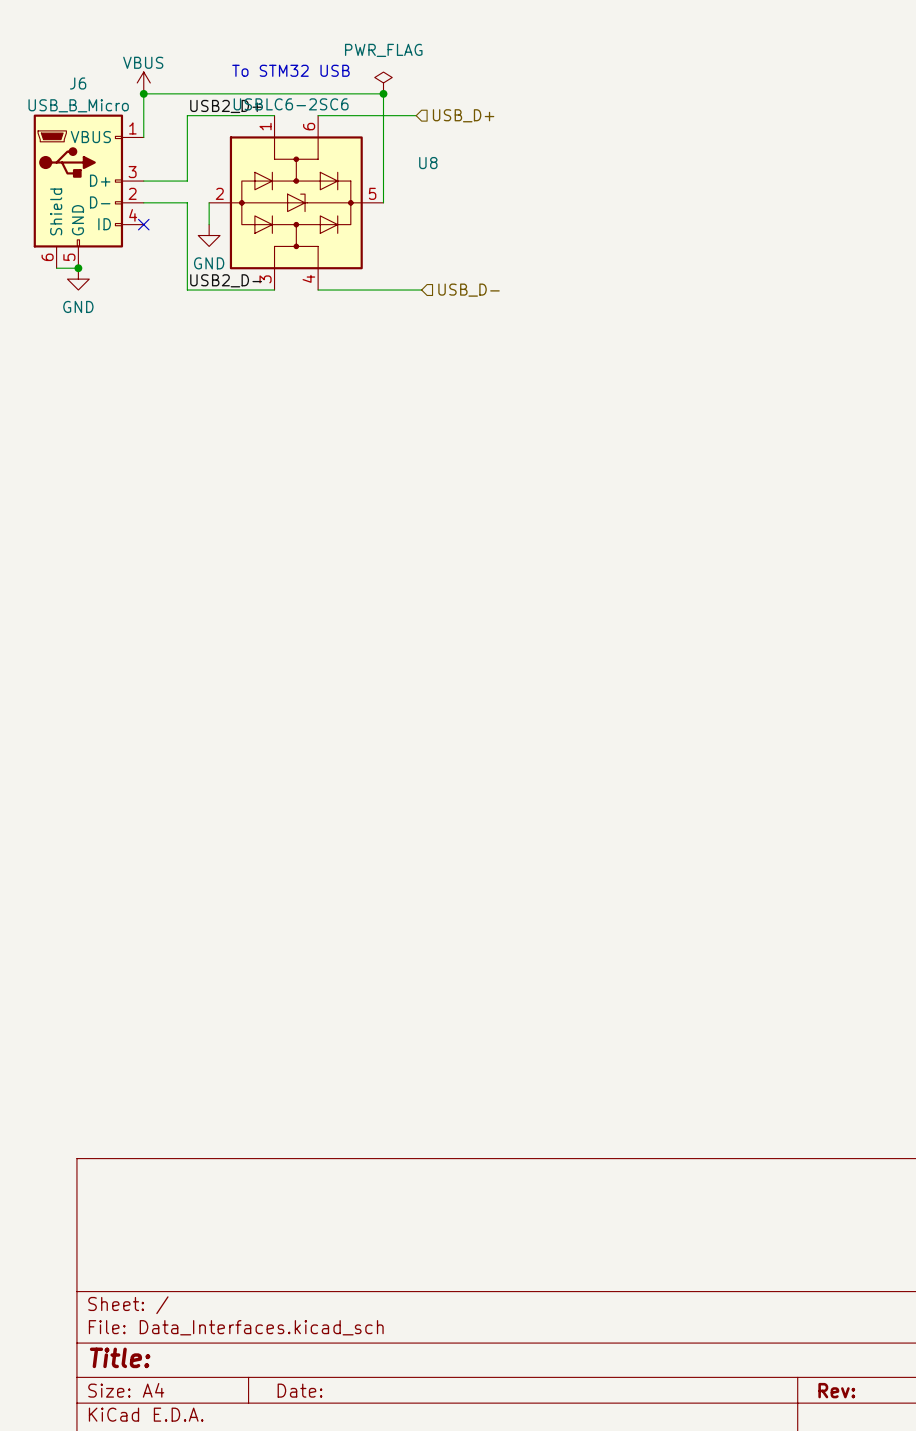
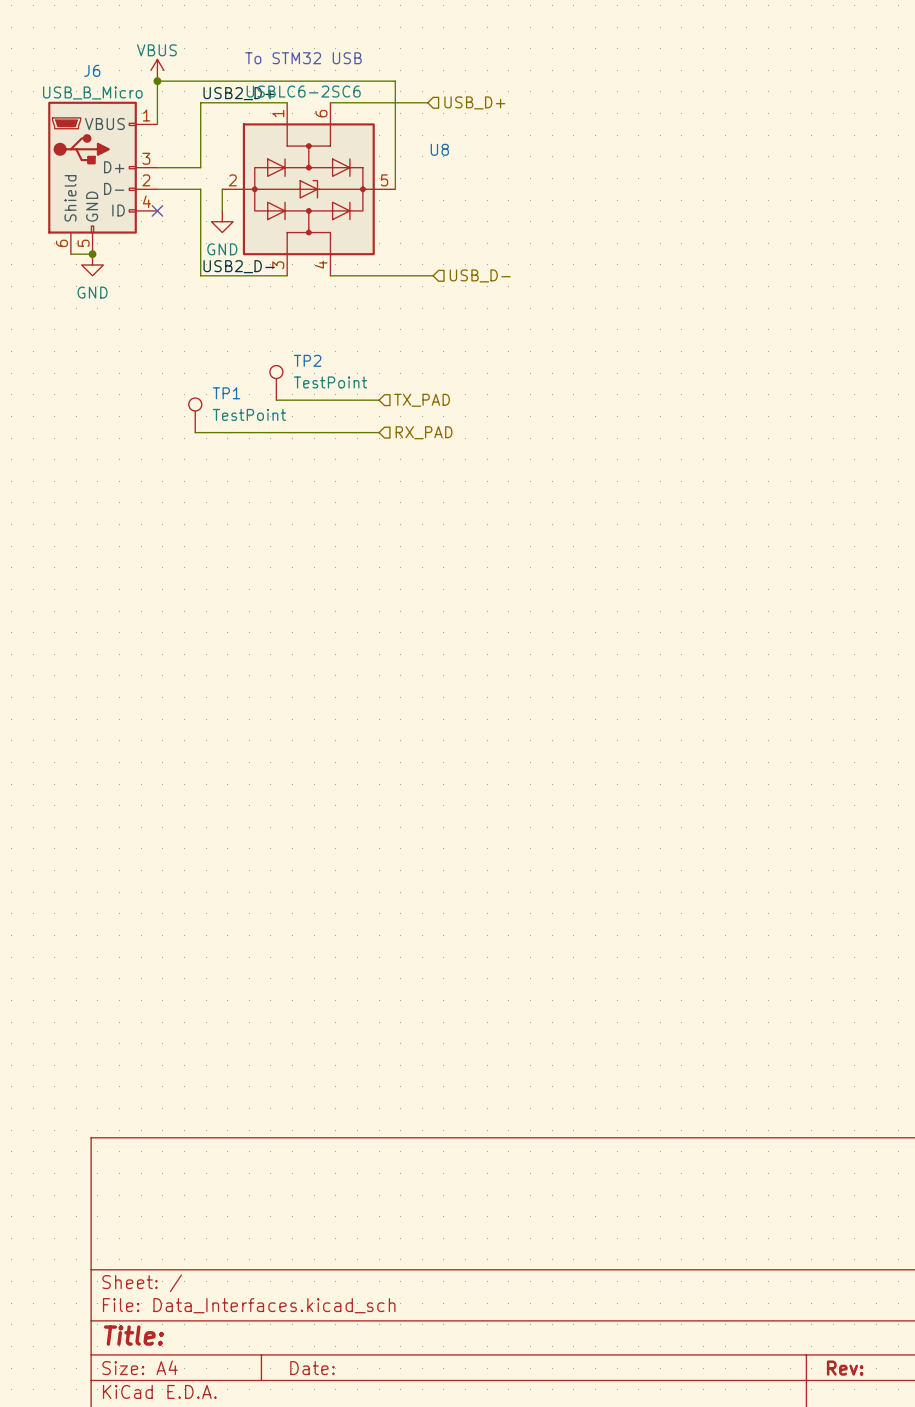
power symbol: PWR_FLAG (383, 82) -> none
junction: (383, 93) -> none
TP2: none -> TestPoint (276, 382)
wire: none -> (276, 400) (379, 400)
hierarchical label: none -> TX_PAD (422, 400)
TP1: none -> TestPoint (195, 415)
wire: none -> (195, 432) (379, 432)
hierarchical label: none -> RX_PAD (424, 432)

